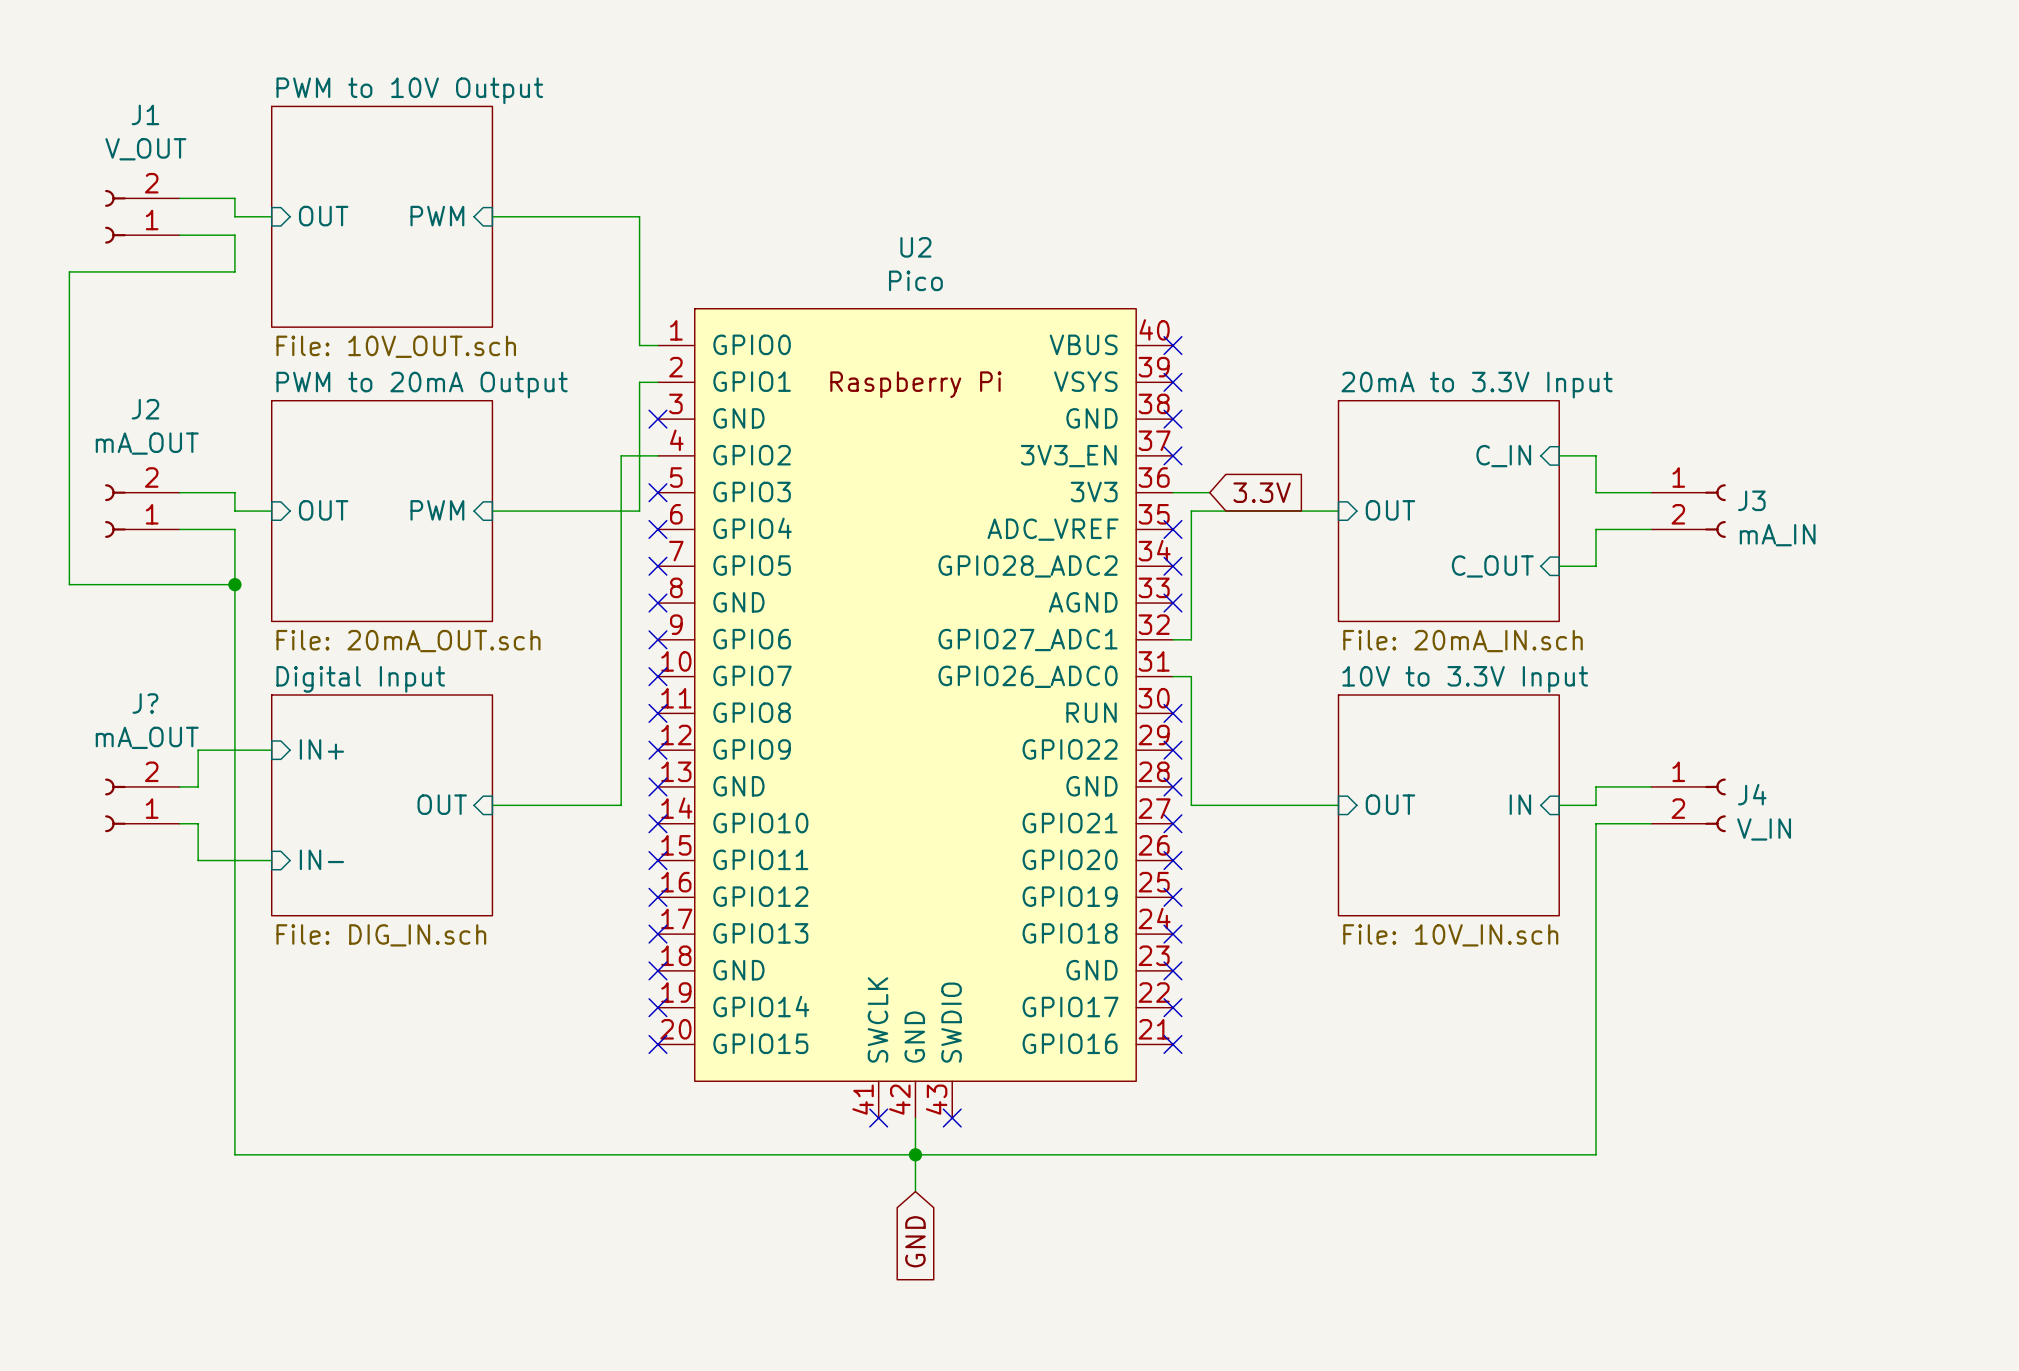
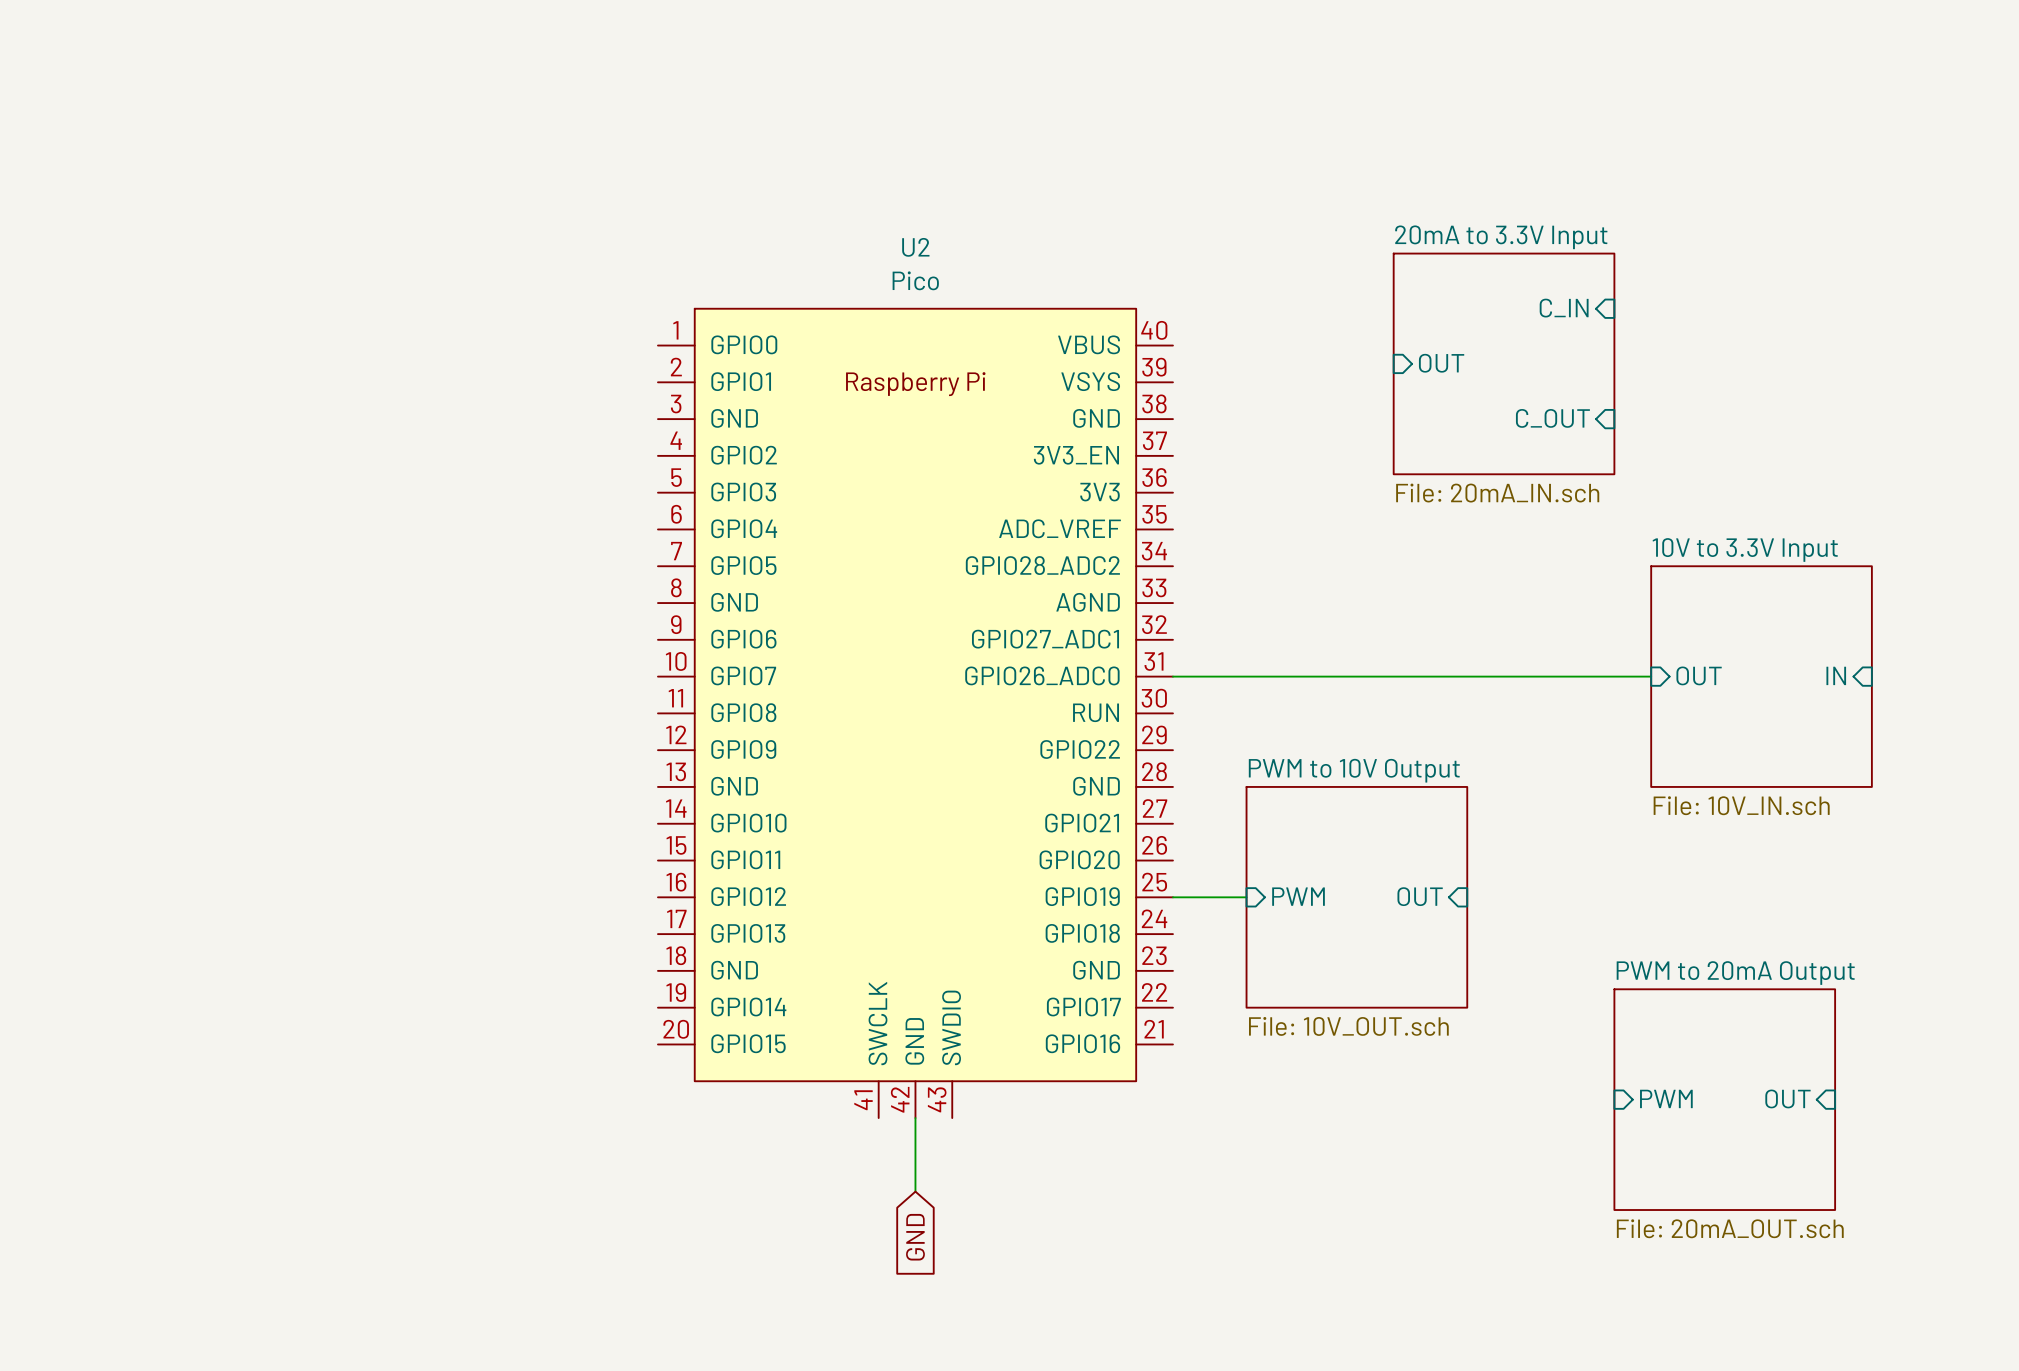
wire: (179, 198) (234, 198) (234, 216) (271, 216) -> none
J1: V_OUT (142, 216) -> none
sheet pin: OUT (323, 216) -> none
sheet PWM to 10V Output position: (382, 216) -> (1356, 897)
sheet pin: PWM (437, 216) -> none
wire: (492, 216) (639, 216) (639, 345) (657, 345) -> none
wire: (179, 235) (234, 235) (234, 271) (69, 271) (69, 584) (234, 584) -> none
no-connect mark: (1172, 345) -> none
wire: (657, 382) (639, 382) (639, 511) (492, 511) -> none
no-connect mark: (1172, 382) -> none
no-connect mark: (657, 419) -> none
no-connect mark: (1172, 419) -> none
wire: (657, 455) (621, 455) (621, 805) (492, 805) -> none
no-connect mark: (1172, 455) -> none
wire: (1559, 455) (1596, 455) (1596, 492) (1651, 492) -> none
sheet pin position: C_IN (1503, 456) -> C_IN (1564, 308)
wire: (179, 492) (234, 492) (234, 511) (271, 511) -> none
no-connect mark: (657, 492) -> none
wire: (1172, 492) (1209, 492) -> none
global label: 3.3V (1262, 492) -> none
sheet pin: OUT (323, 510) -> none
sheet pin: PWM (437, 510) -> none
sheet pin position: OUT (1390, 510) -> OUT (1441, 363)
J2: mA_OUT (142, 511) -> none
sheet PWM to 20mA Output position: (382, 511) -> (1724, 1099)
wire: (1338, 511) (1191, 511) (1191, 639) (1172, 639) -> none
sheet 20mA to 3.3V Input position: (1448, 511) -> (1504, 363)
J3: mA_IN (1688, 511) -> none
wire: (179, 529) (234, 529) (234, 1154) (1596, 1154) (1596, 823) (1651, 823) -> none
no-connect mark: (657, 529) -> none
no-connect mark: (1172, 529) -> none
wire: (1651, 529) (1596, 529) (1596, 566) (1559, 566) -> none
no-connect mark: (657, 566) -> none
no-connect mark: (1172, 566) -> none
sheet pin position: C_OUT (1492, 566) -> C_OUT (1552, 418)
junction: (234, 584) -> none
no-connect mark: (657, 603) -> none
no-connect mark: (1172, 603) -> none
no-connect mark: (657, 639) -> none
sheet pin: none -> OUT (1699, 675)
no-connect mark: (657, 676) -> none
wire: (1191, 676) (1191, 805) (1338, 805) -> (1191, 676) (1651, 676)
no-connect mark: (657, 713) -> none
no-connect mark: (1172, 713) -> none
sheet pin: IN+ (321, 749) -> none
wire: (271, 750) (198, 750) (198, 786) (179, 786) -> none
no-connect mark: (657, 750) -> none
no-connect mark: (1172, 750) -> none
no-connect mark: (657, 786) -> none
no-connect mark: (1172, 786) -> none
wire: (1651, 786) (1596, 786) (1596, 805) (1559, 805) -> none
sheet pin: OUT (442, 804) -> none
sheet pin rotation: 0° (1390, 804) -> 180° (1420, 896)
sheet pin position: OUT (1390, 804) -> OUT (1420, 896)
sheet pin position: IN (1520, 804) -> IN (1836, 675)
J?: mA_OUT (142, 805) -> none
sheet Digital Input: File: DIG_IN.sch (382, 805) -> none
sheet 10V to 3.3V Input position: (1448, 805) -> (1761, 676)
J4: V_IN (1688, 805) -> none
wire: (179, 823) (198, 823) (198, 860) (271, 860) -> none
no-connect mark: (657, 823) -> none
no-connect mark: (1172, 823) -> none
sheet pin: IN- (321, 859) -> none
no-connect mark: (657, 860) -> none
no-connect mark: (1172, 860) -> none
sheet pin: none -> PWM (1298, 896)
no-connect mark: (657, 897) -> none
wire: none -> (1172, 897) (1246, 897)
no-connect mark: (1172, 897) -> none
no-connect mark: (657, 934) -> none
no-connect mark: (1172, 934) -> none
no-connect mark: (657, 970) -> none
no-connect mark: (1172, 970) -> none
no-connect mark: (657, 1007) -> none
no-connect mark: (1172, 1007) -> none
no-connect mark: (657, 1044) -> none
no-connect mark: (1172, 1044) -> none
sheet pin: none -> PWM (1666, 1098)
sheet pin: none -> OUT (1787, 1098)
no-connect mark: (878, 1118) -> none
no-connect mark: (952, 1118) -> none
junction: (915, 1154) -> none

